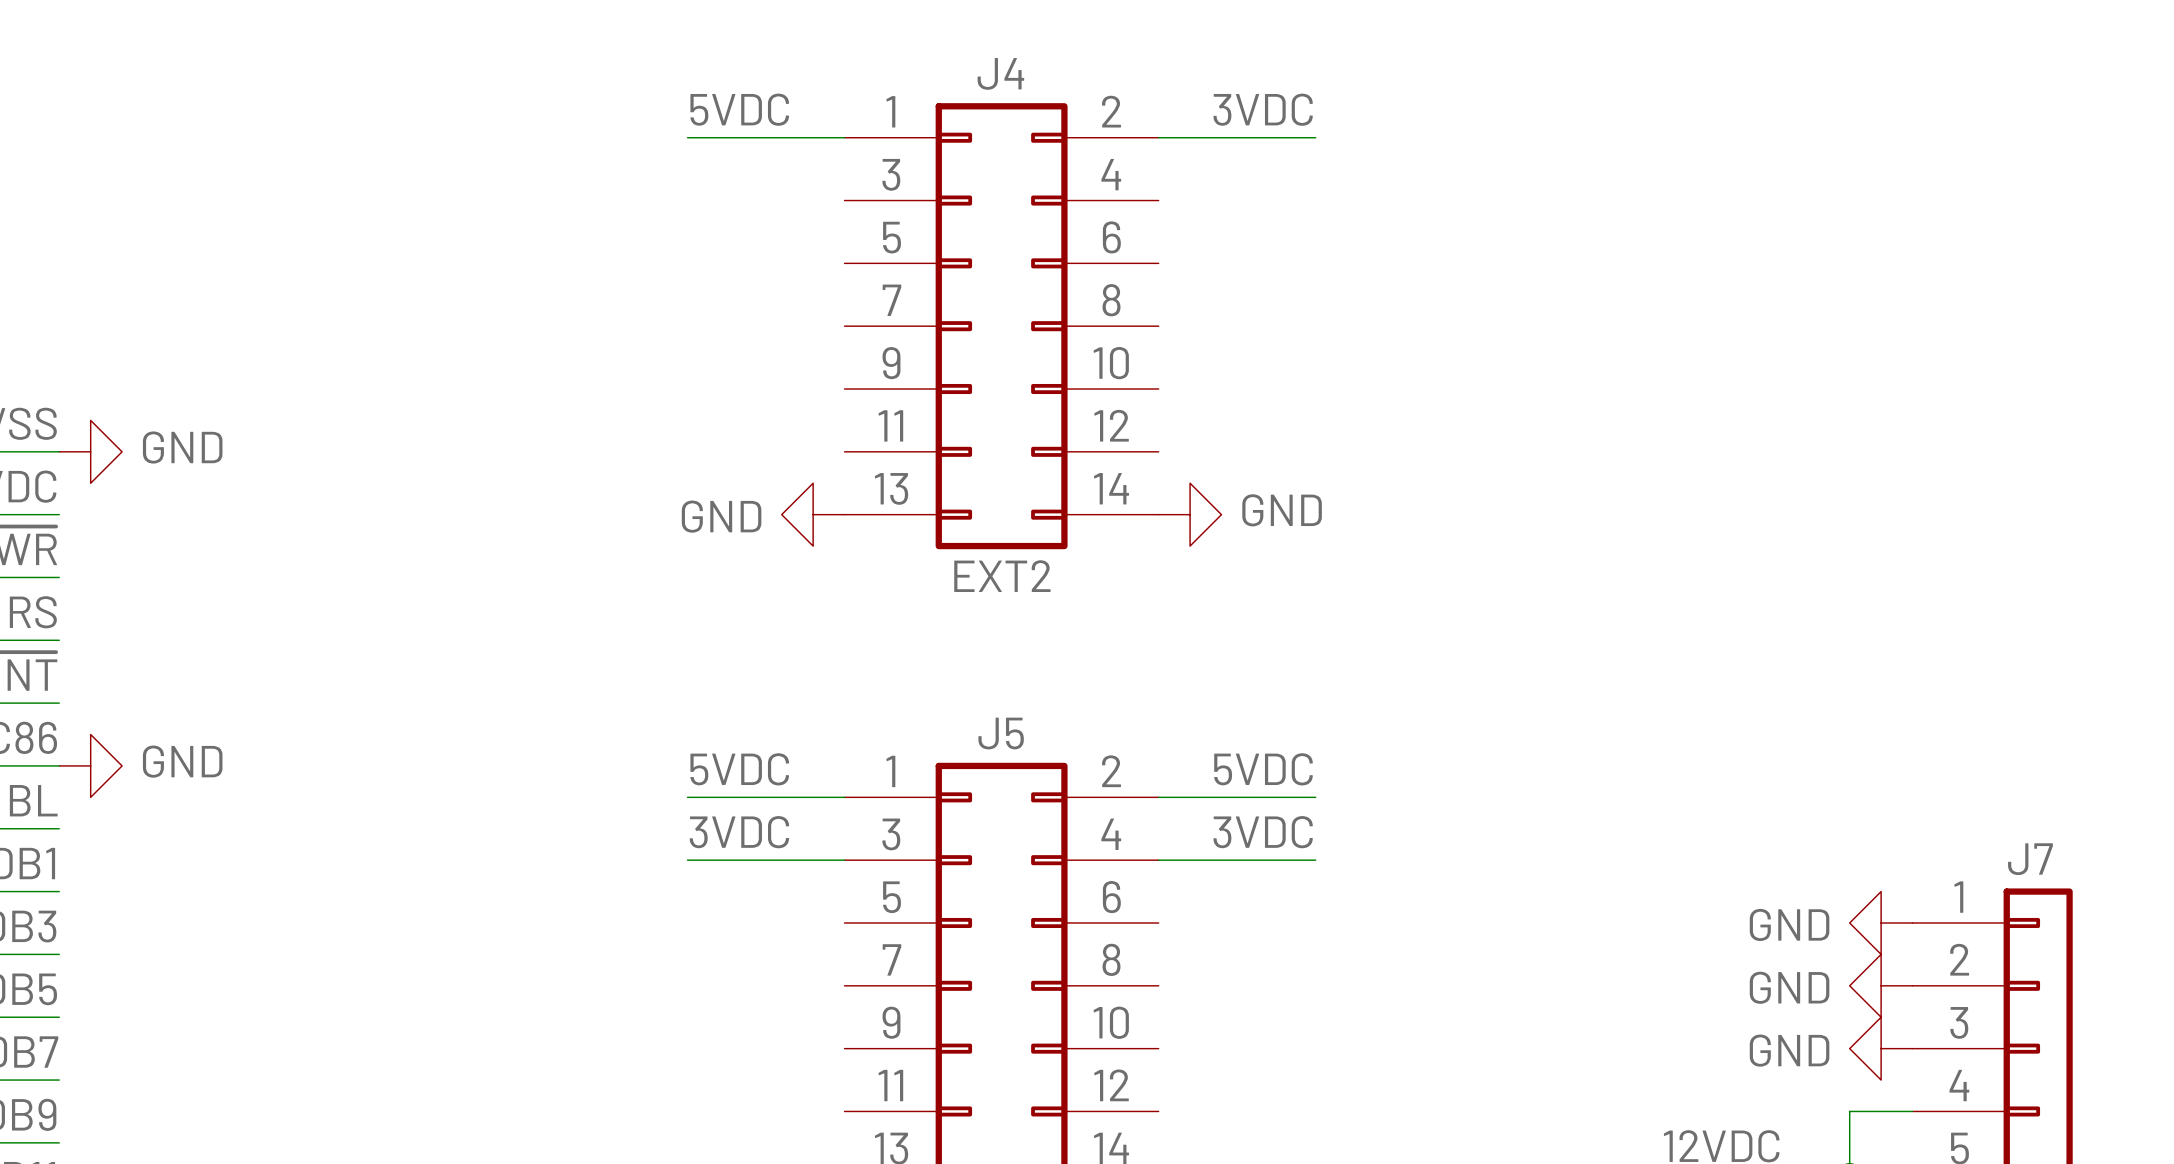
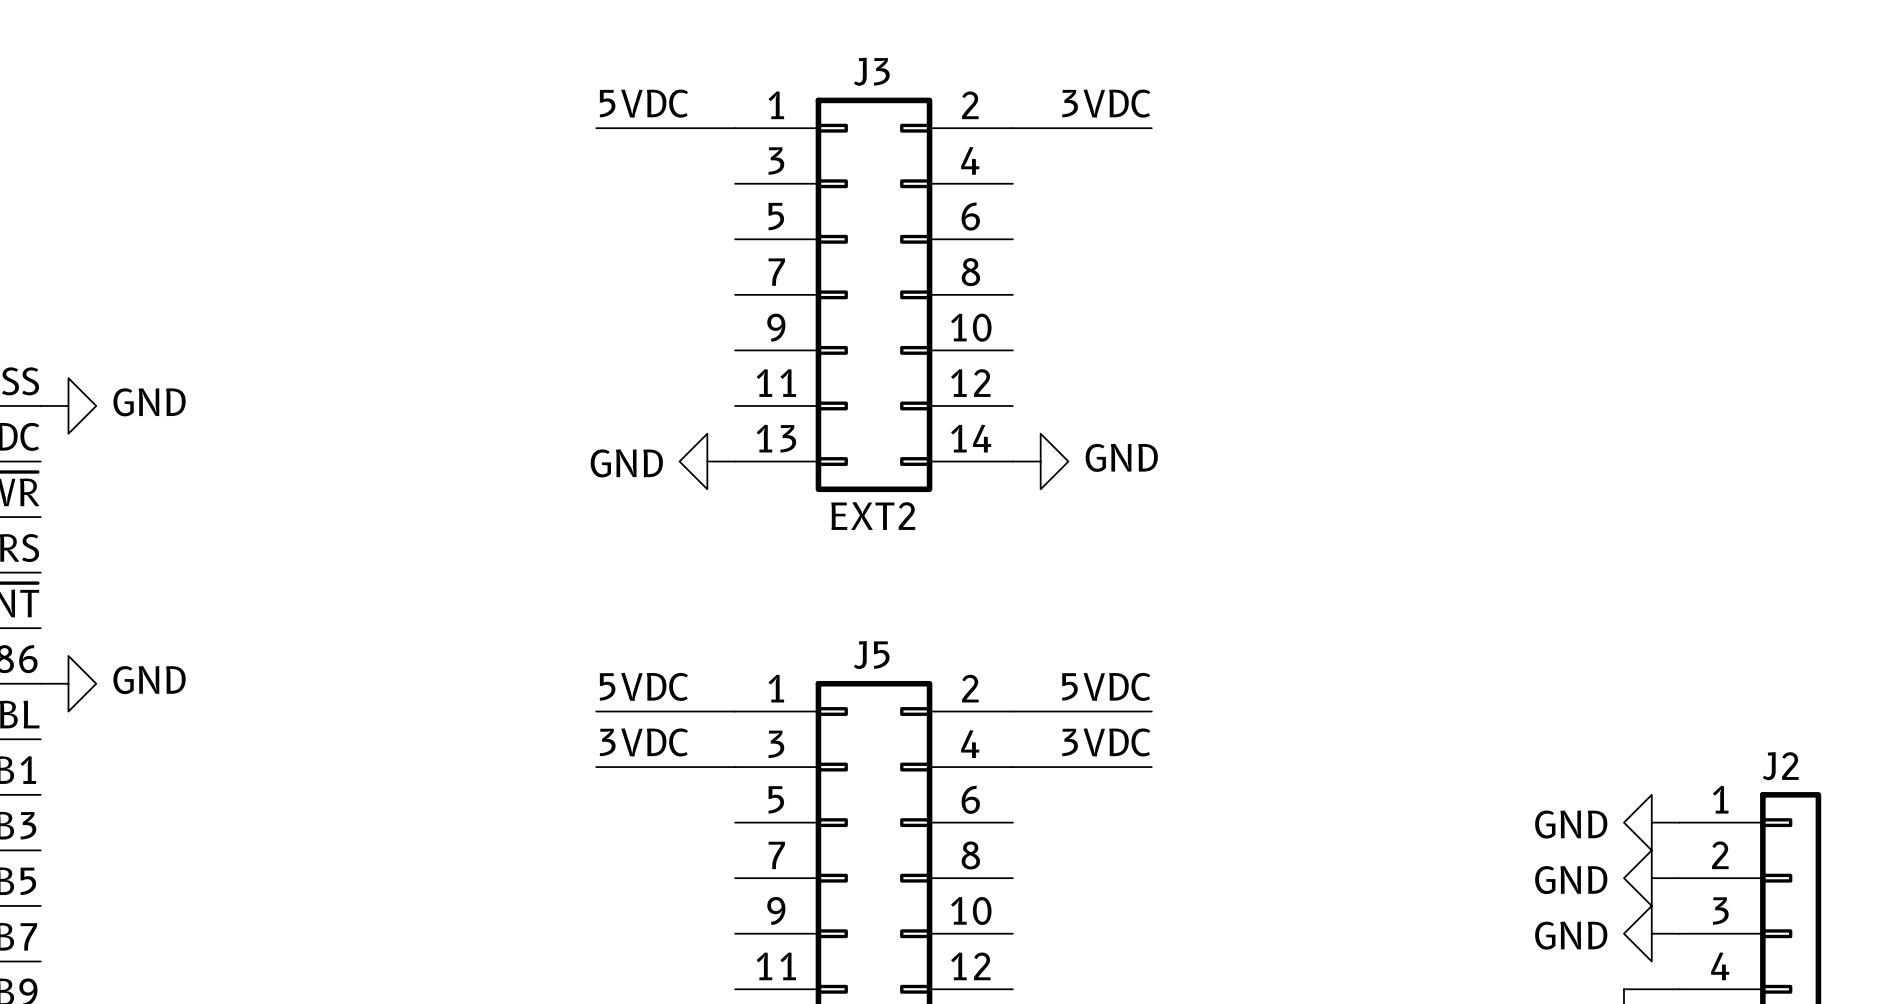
J4 name: J4 (1000, 73) -> J3 (871, 71)
J7 name: J7 (2030, 859) -> J2 (1780, 766)

